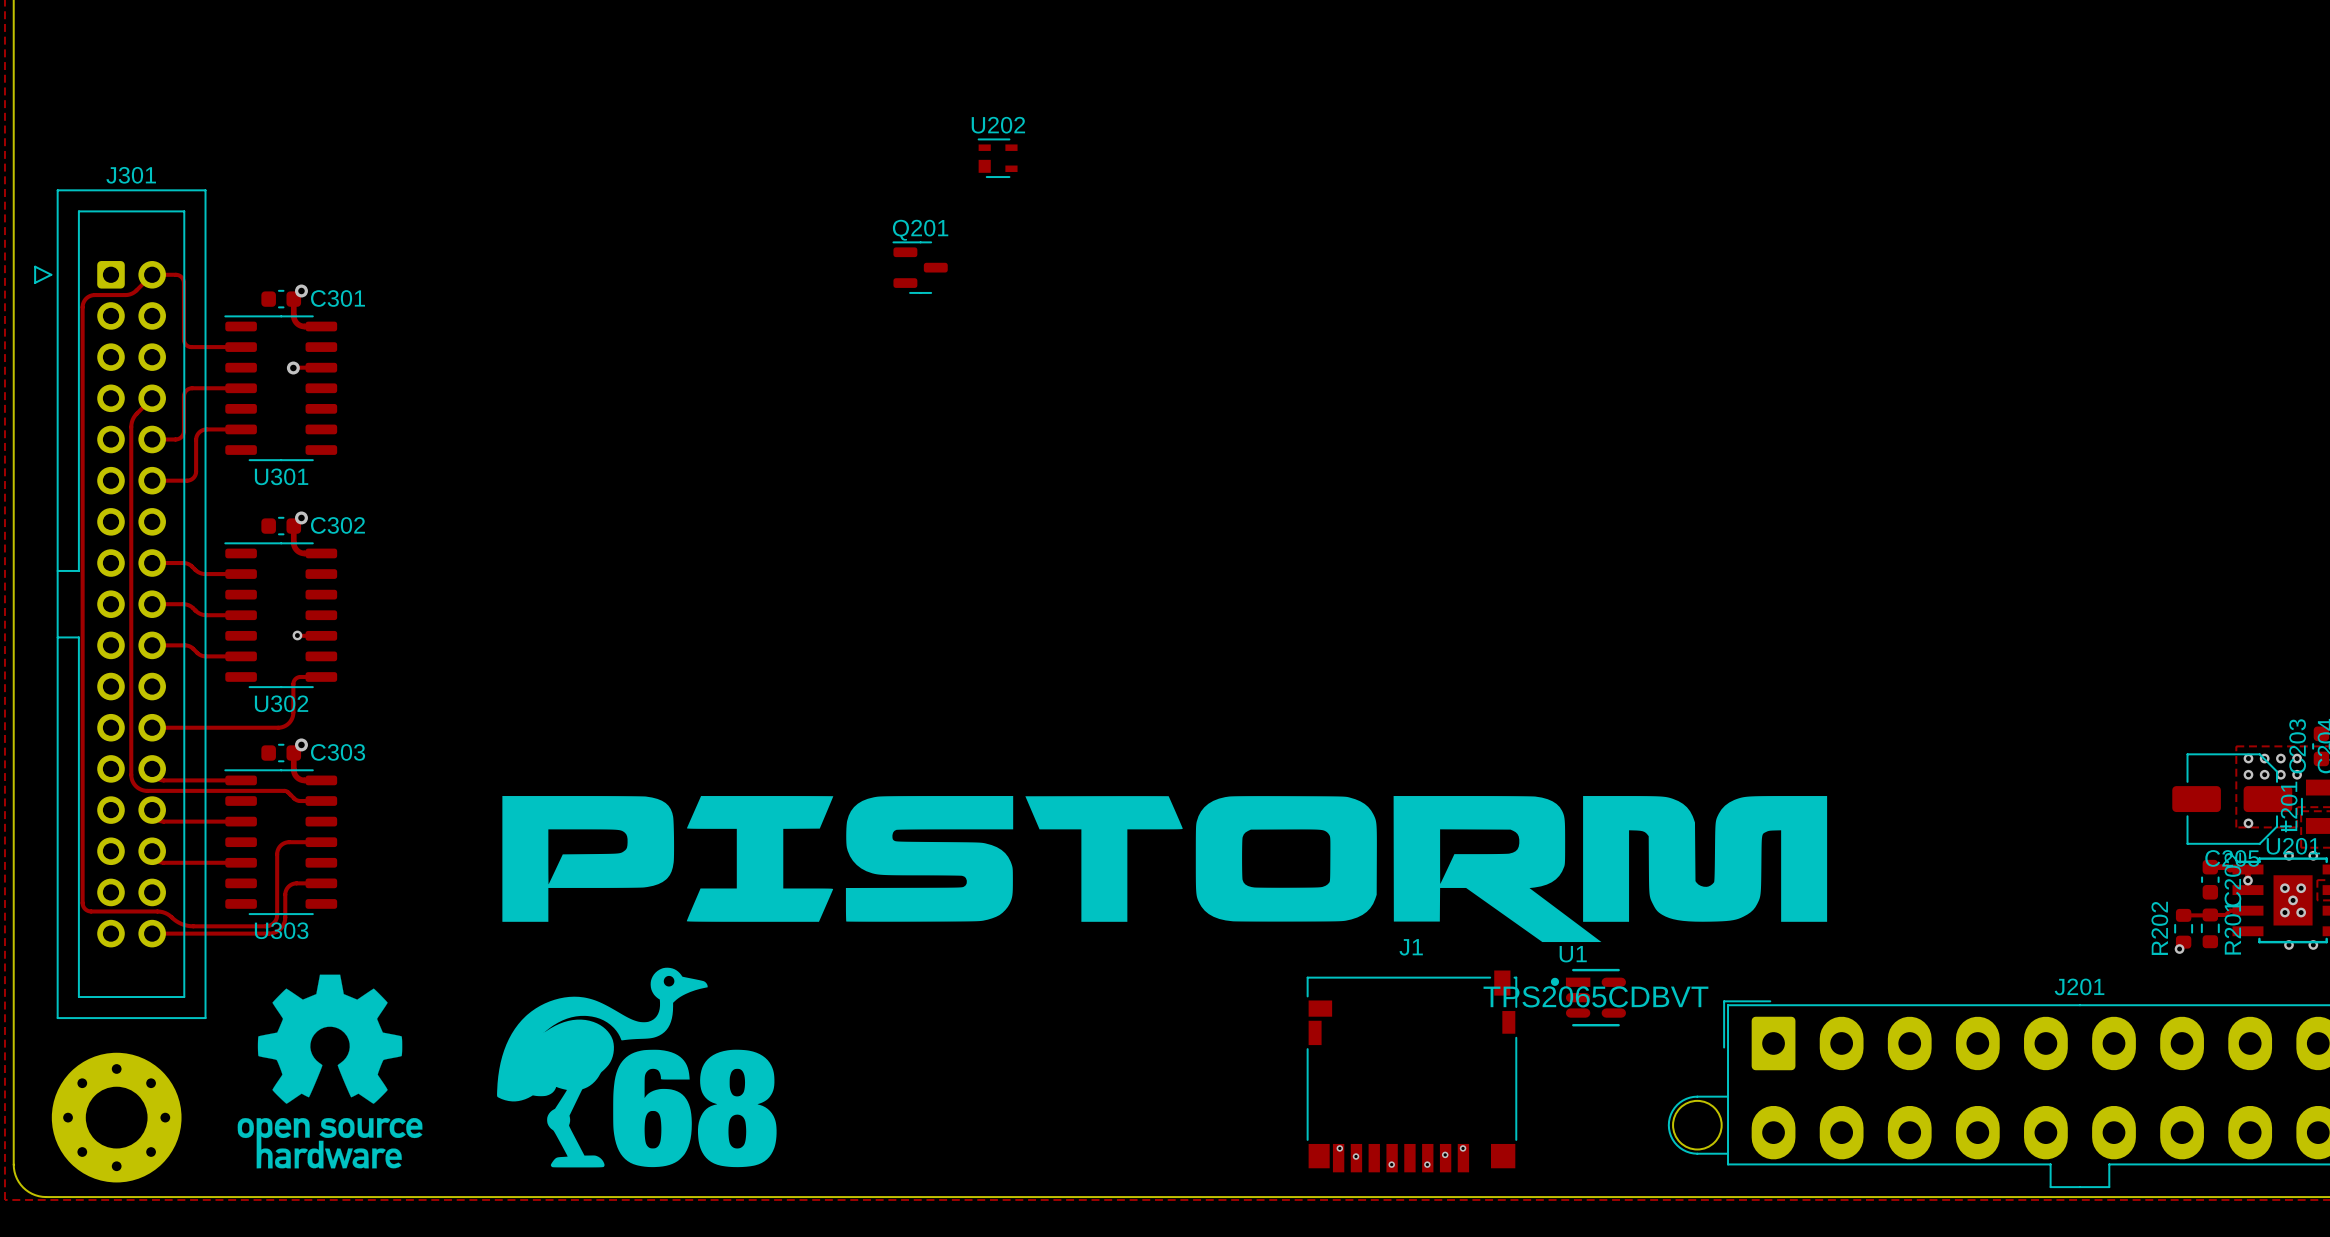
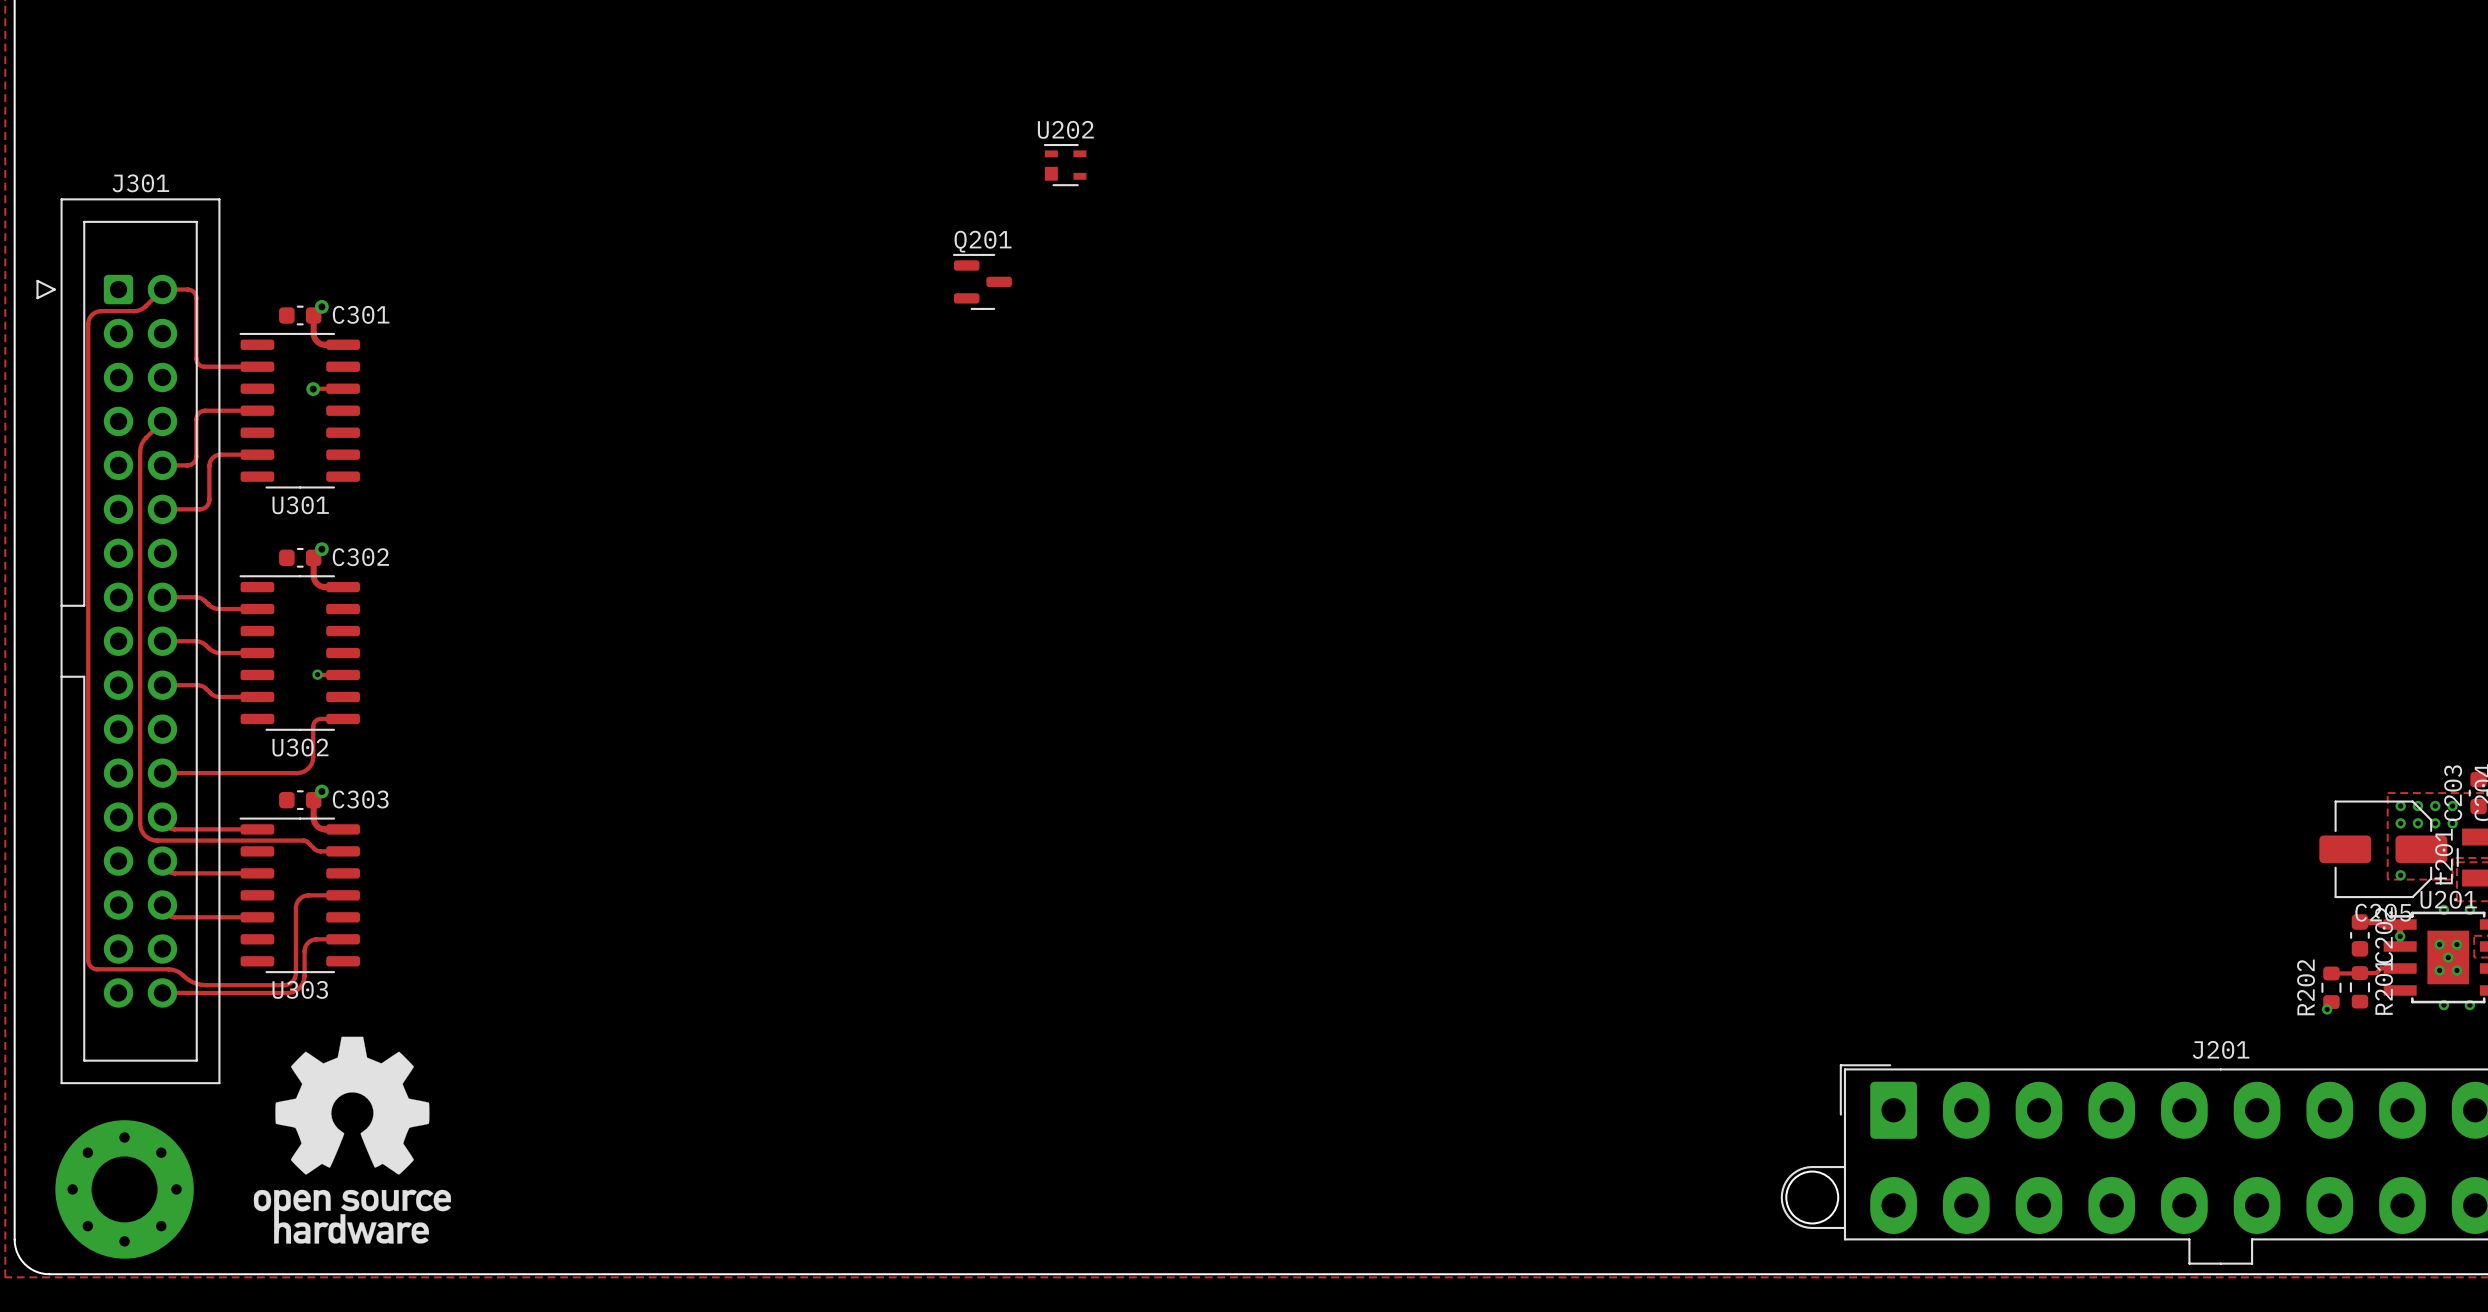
drawing: [502, 796, 1828, 943] -> none
drawing: [497, 967, 777, 1168] -> none
U1: TPS2065CDBVT (1588, 997) -> none
J1: (1411, 1071) -> none
via: (1339, 1148) -> none
via: (1463, 1148) -> none
via: (1445, 1154) -> none
via: (1356, 1156) -> none
via: (1391, 1164) -> none
via: (1427, 1164) -> none

